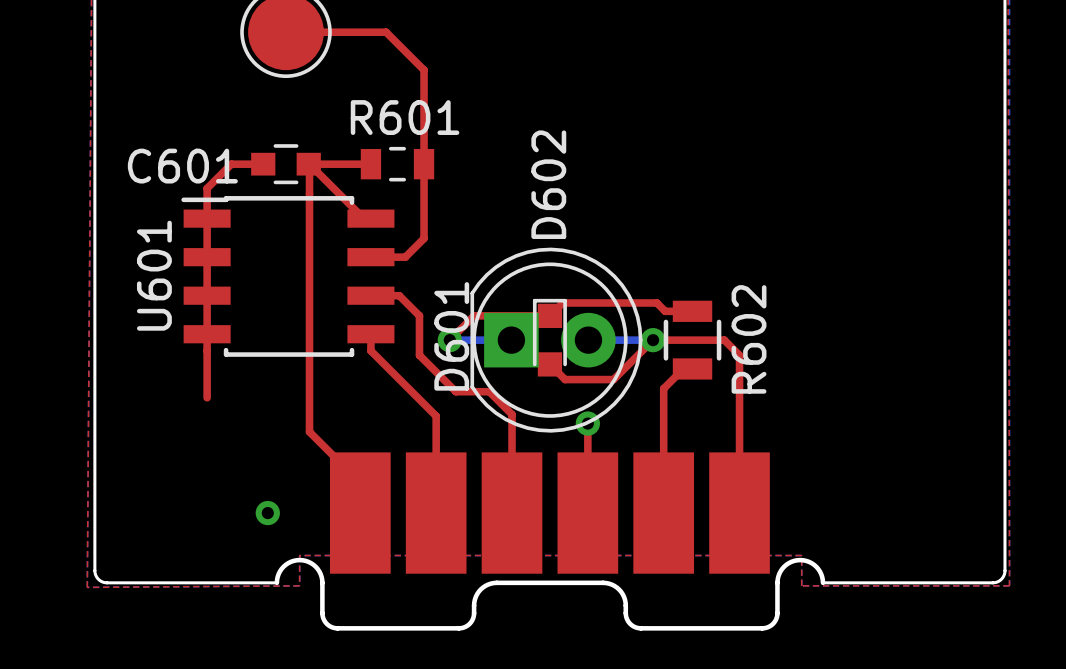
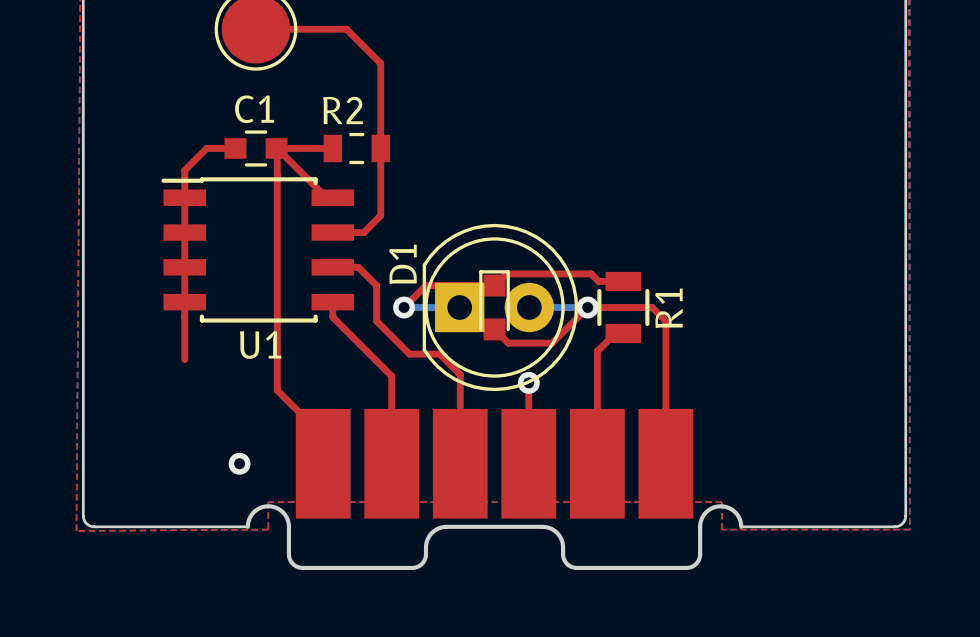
R601 name: R601 (405, 117) -> R2 (342, 110)
C601 name: C601 (182, 166) -> C1 (254, 109)
D602 name: D602 (548, 184) -> none
U601 name: U601 (154, 275) -> U1 (260, 345)
D601 name: D601 (451, 336) -> D1 (403, 264)
R602 name: R602 (749, 339) -> R1 (668, 308)

